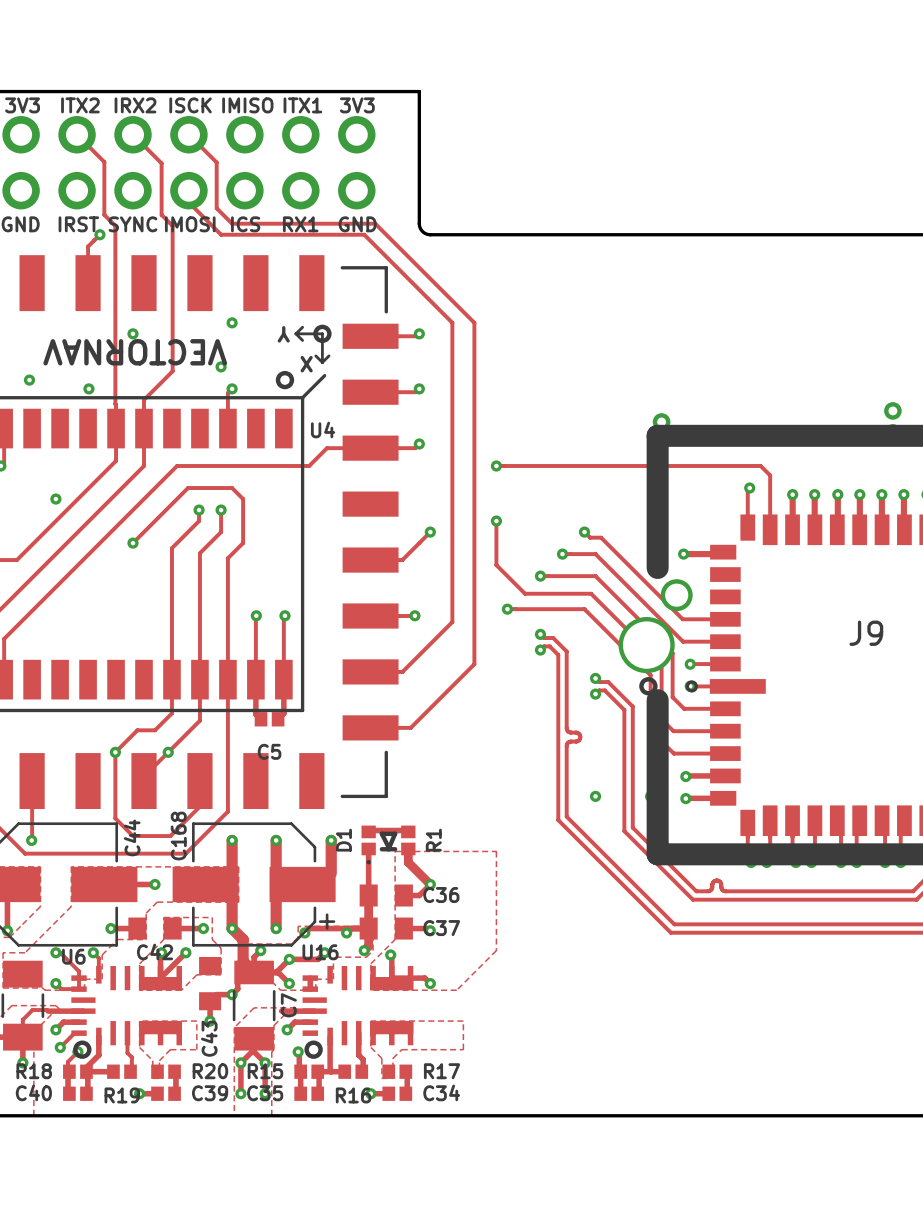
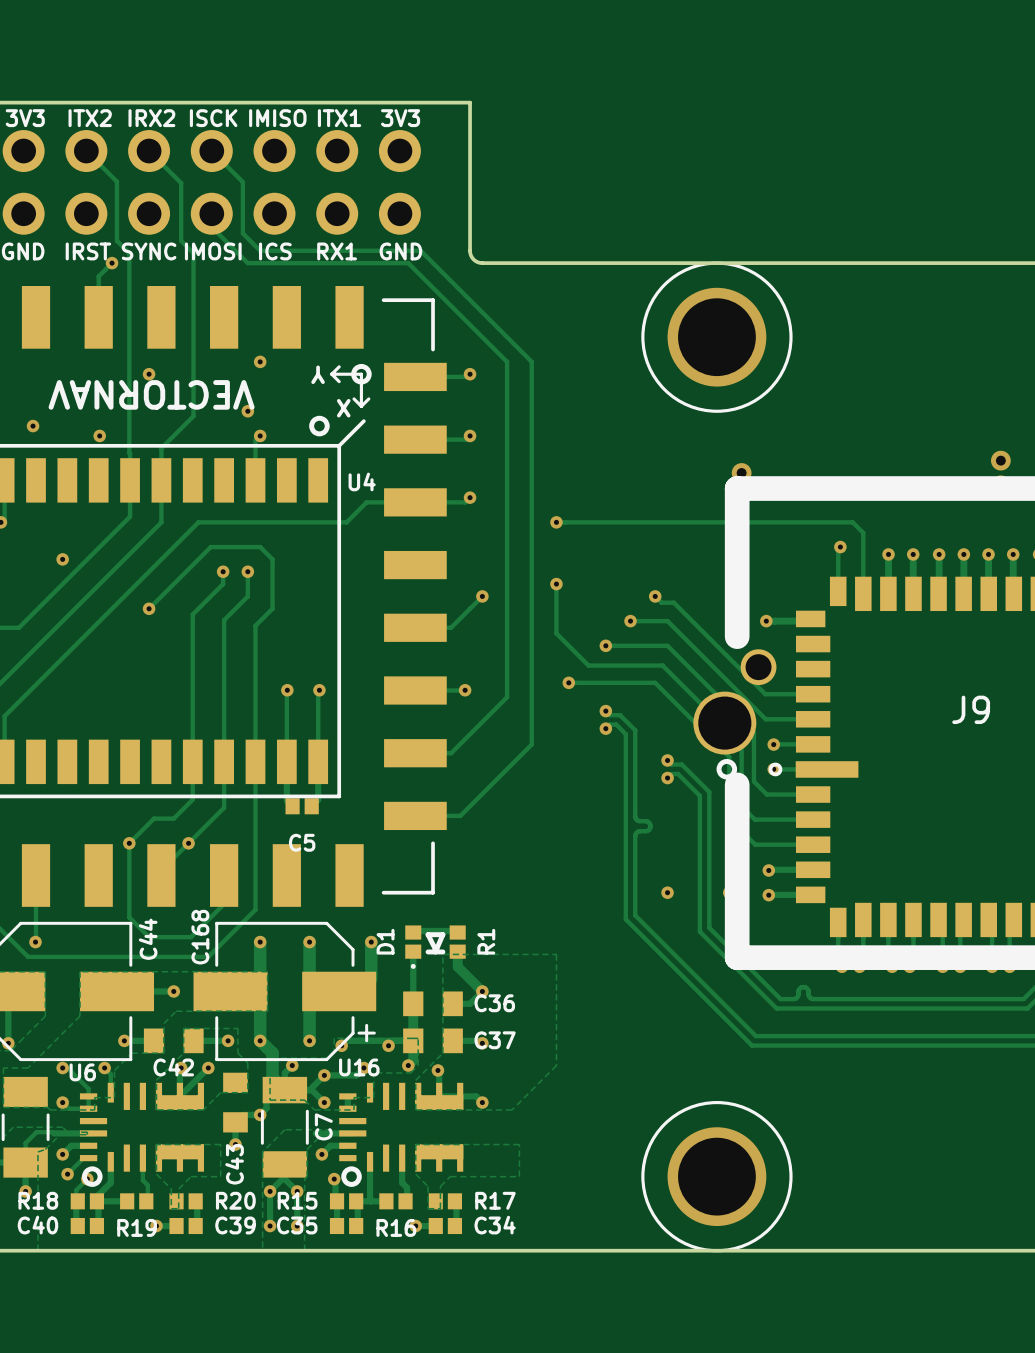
drawing: none -> [641, 261, 793, 413]
via: none -> (716, 337)
drawing: none -> [641, 1101, 793, 1253]
via: none -> (716, 1176)

